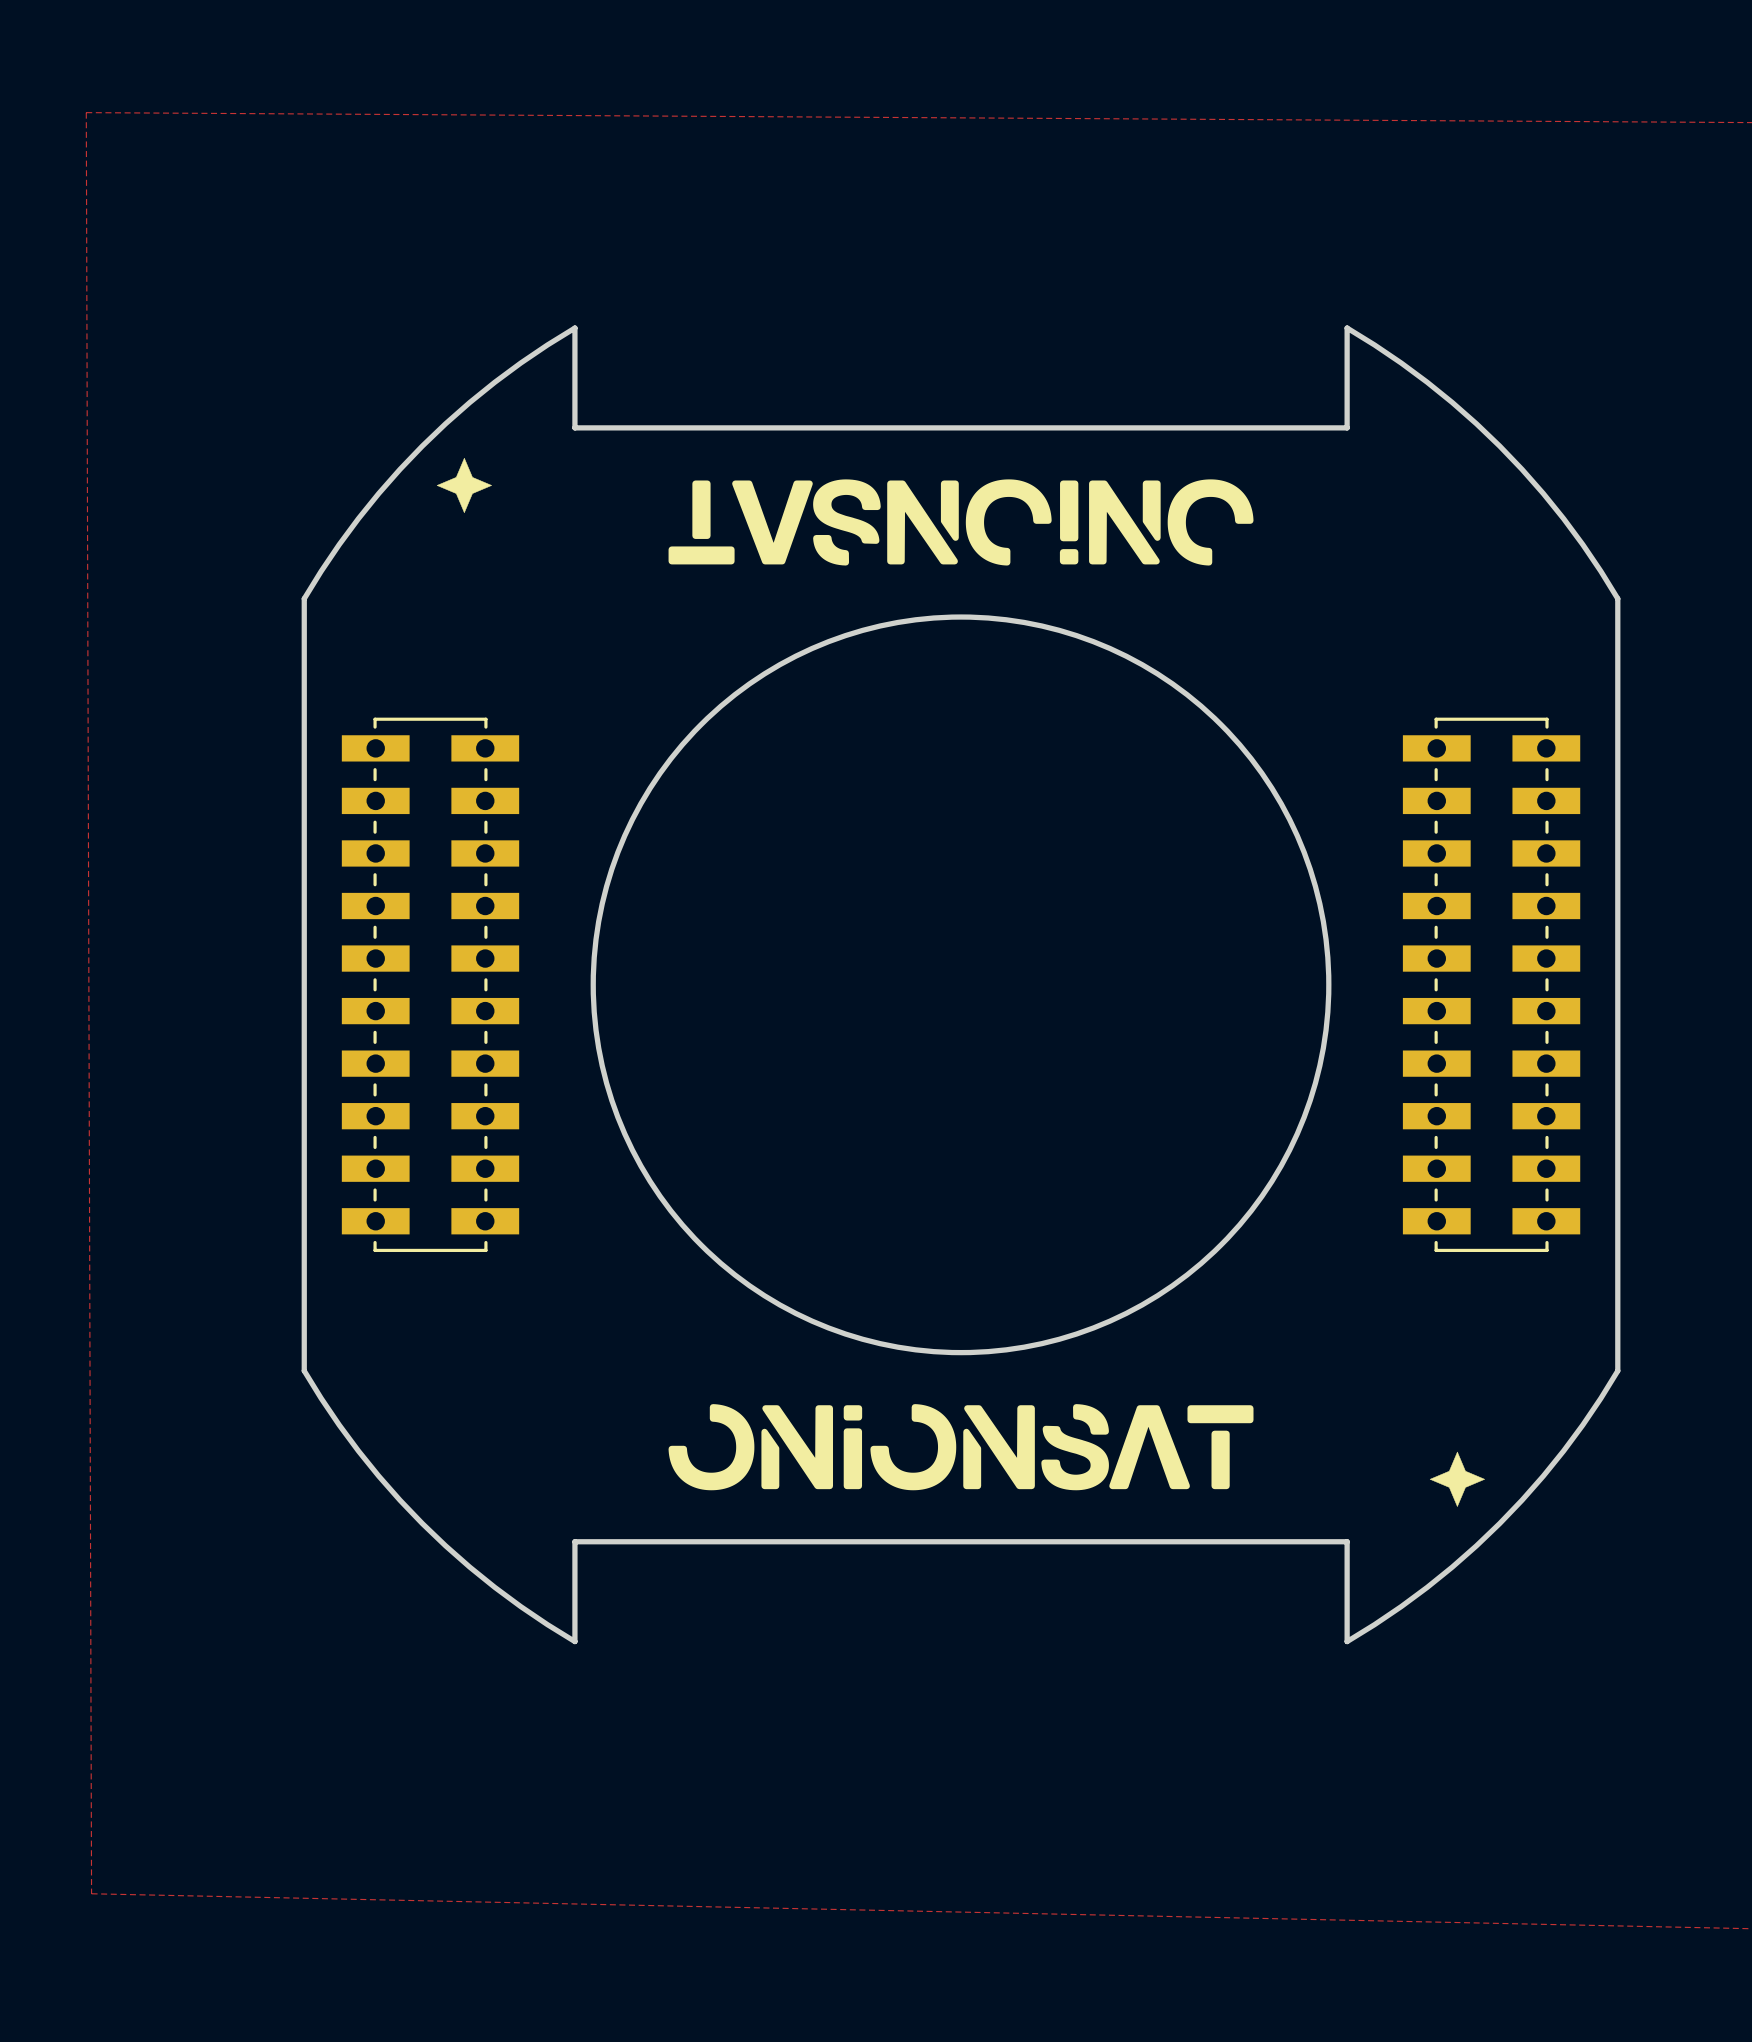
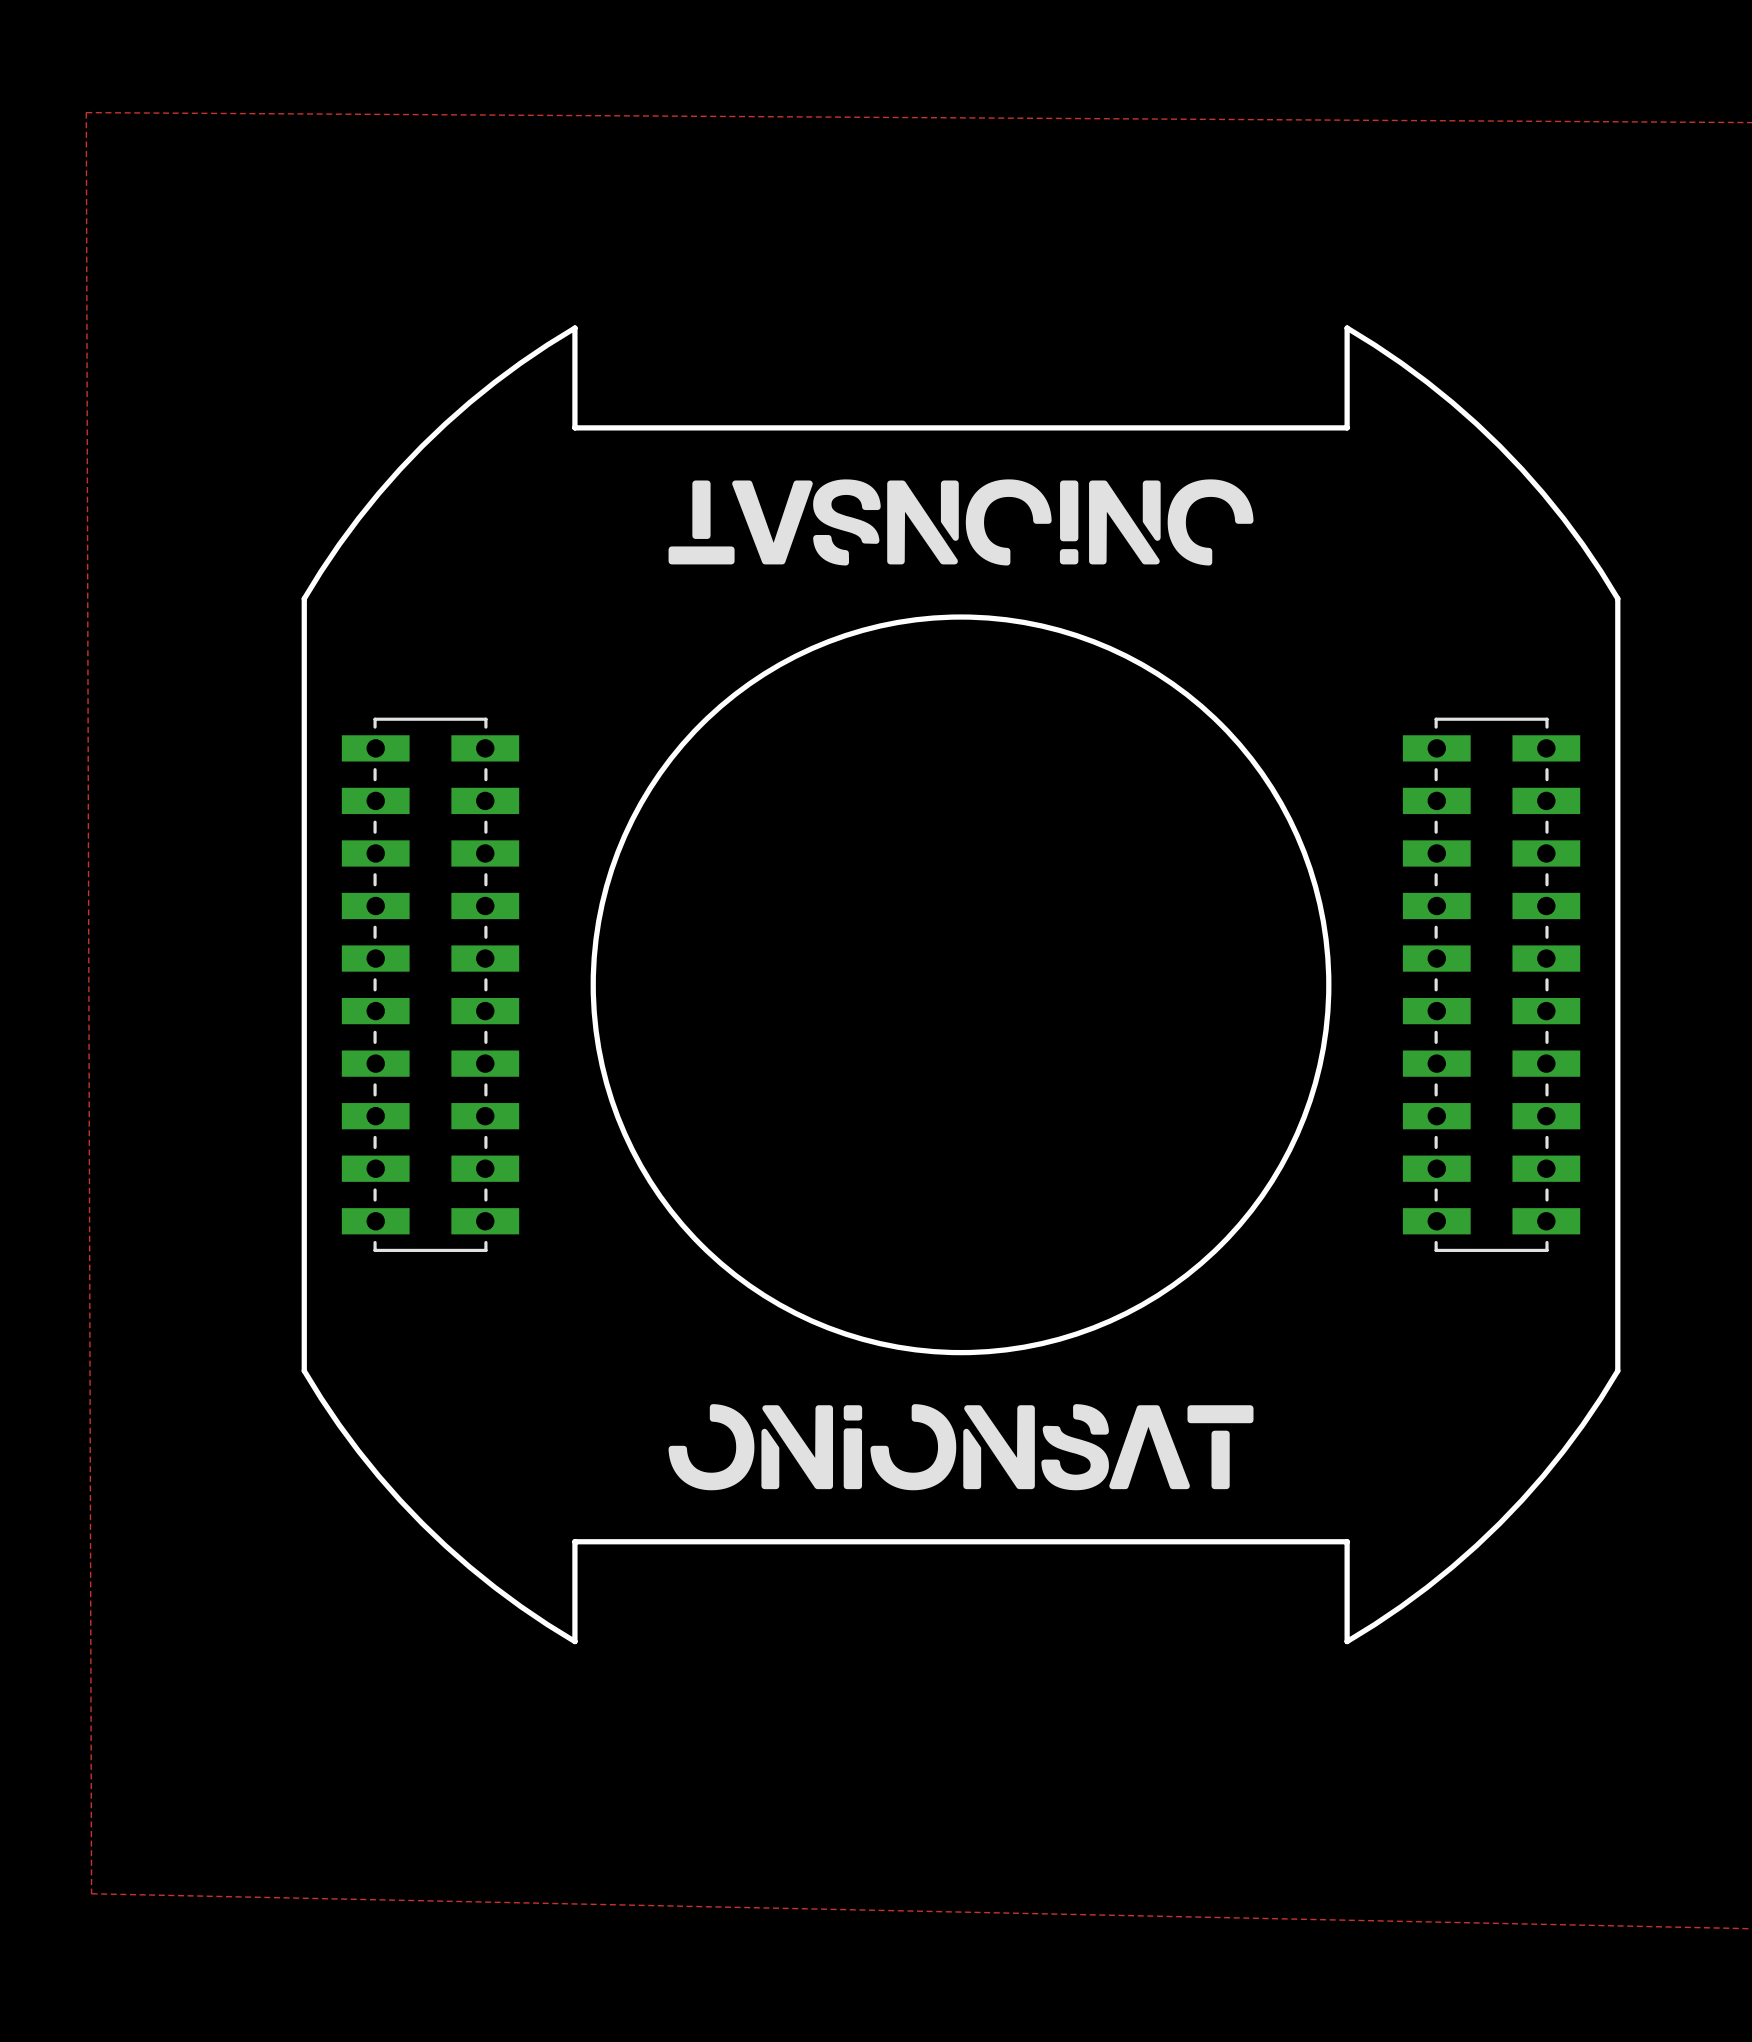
drawing: [436, 457, 492, 513] -> none
drawing: [1429, 1451, 1485, 1507] -> none

